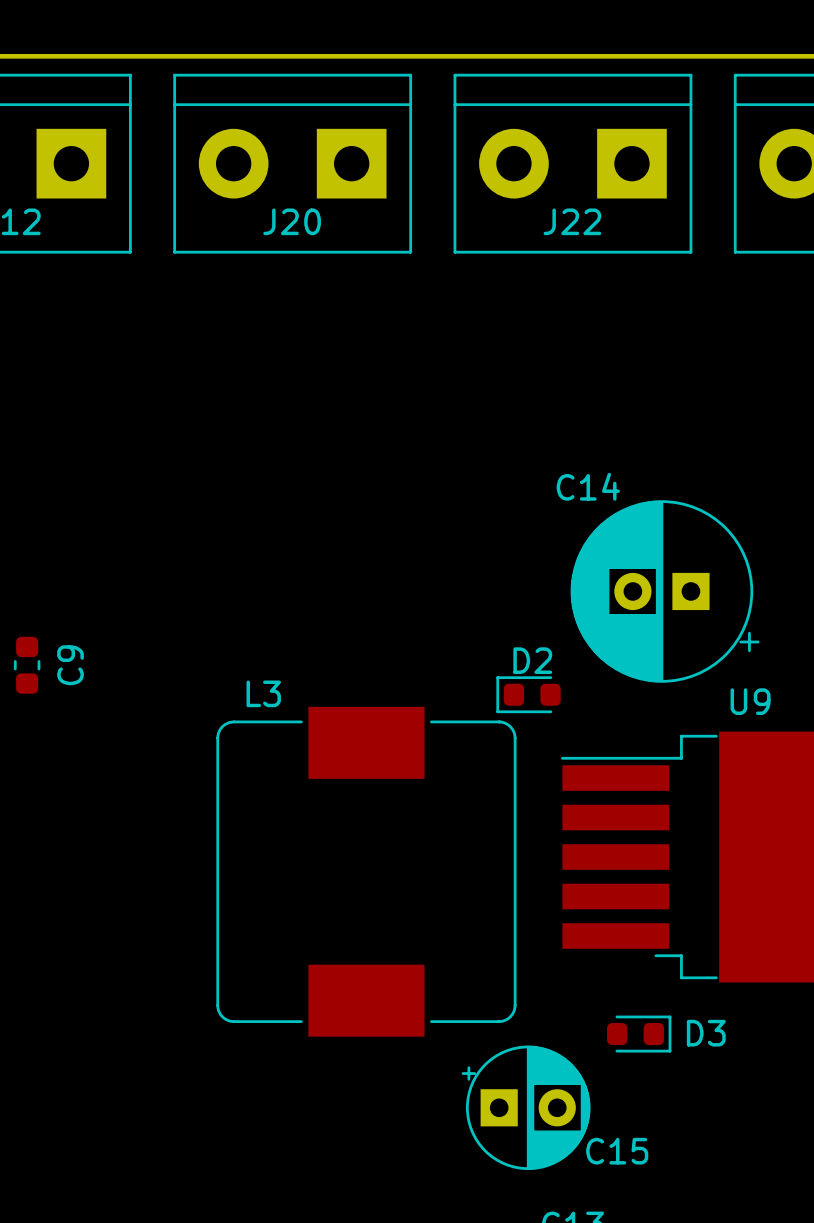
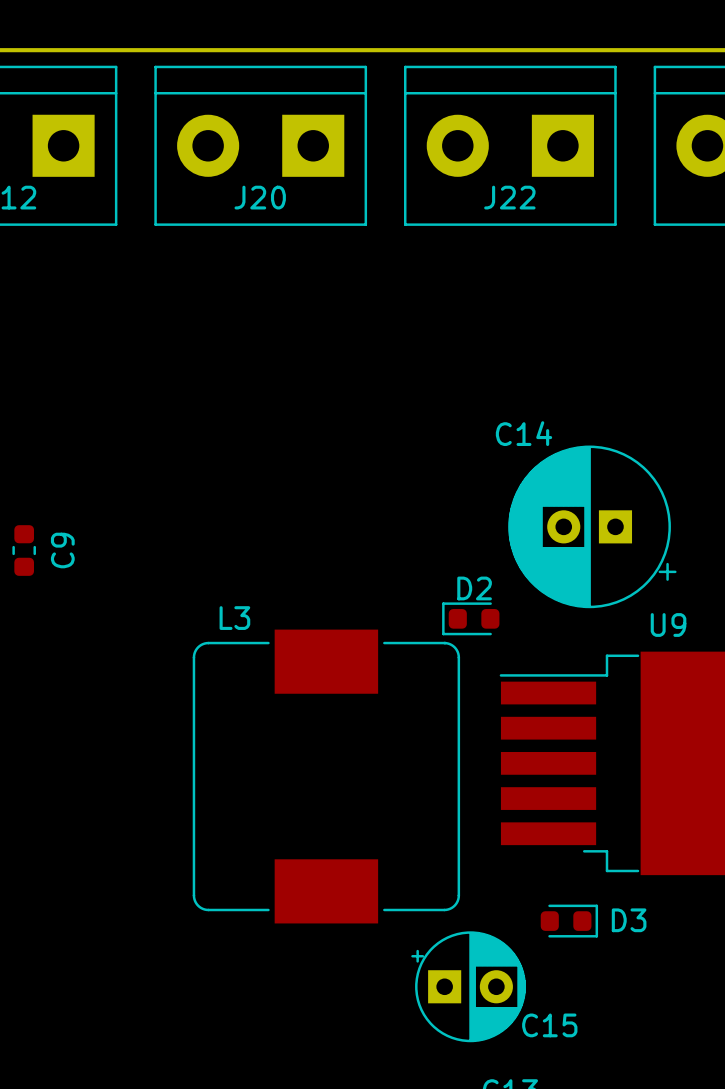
C9 position: (27, 665) -> (24, 550)

